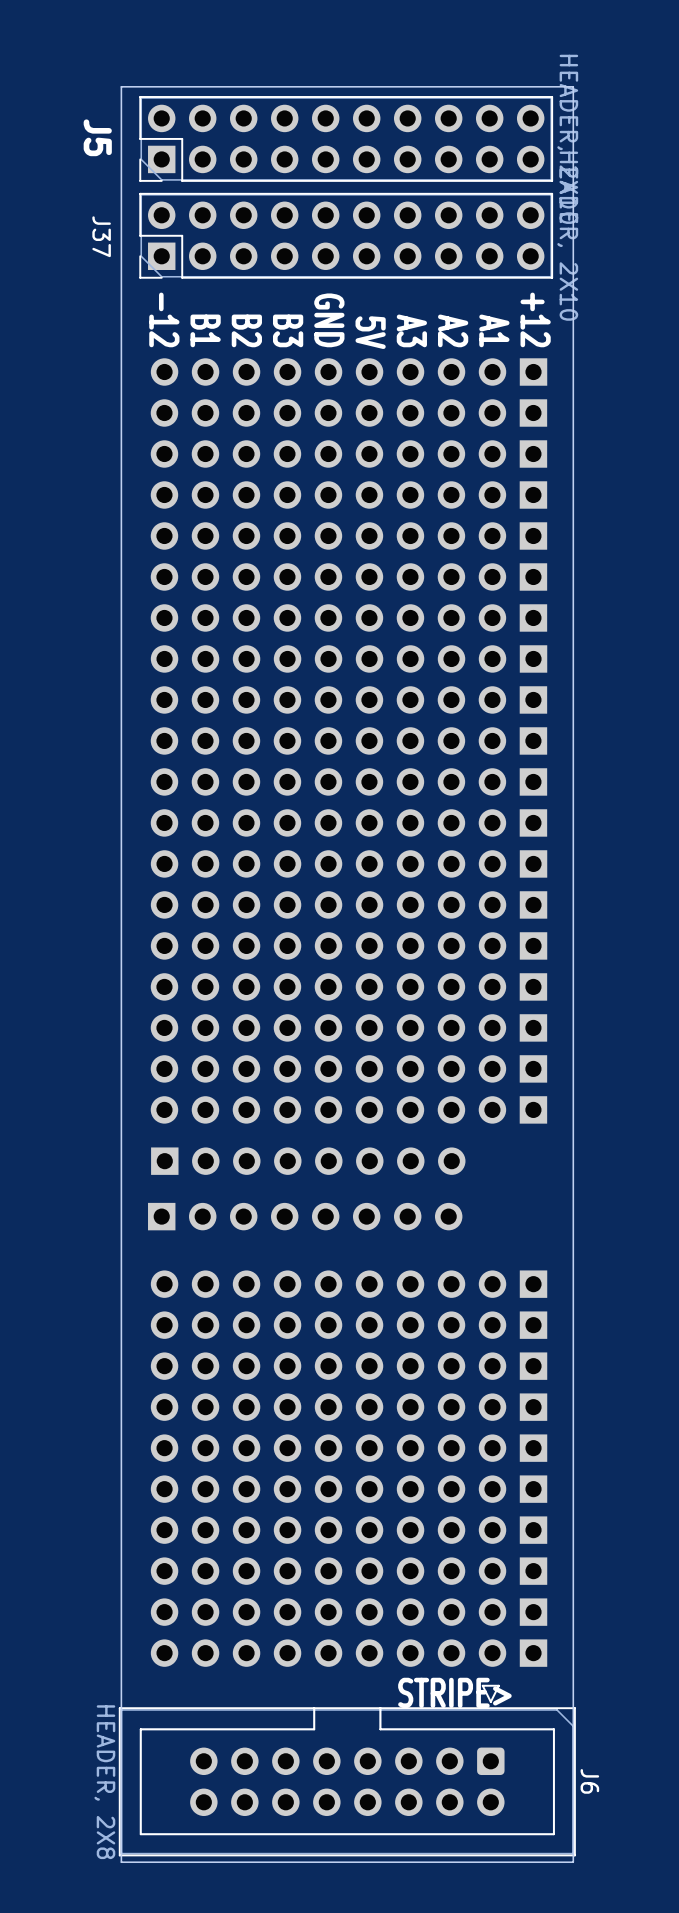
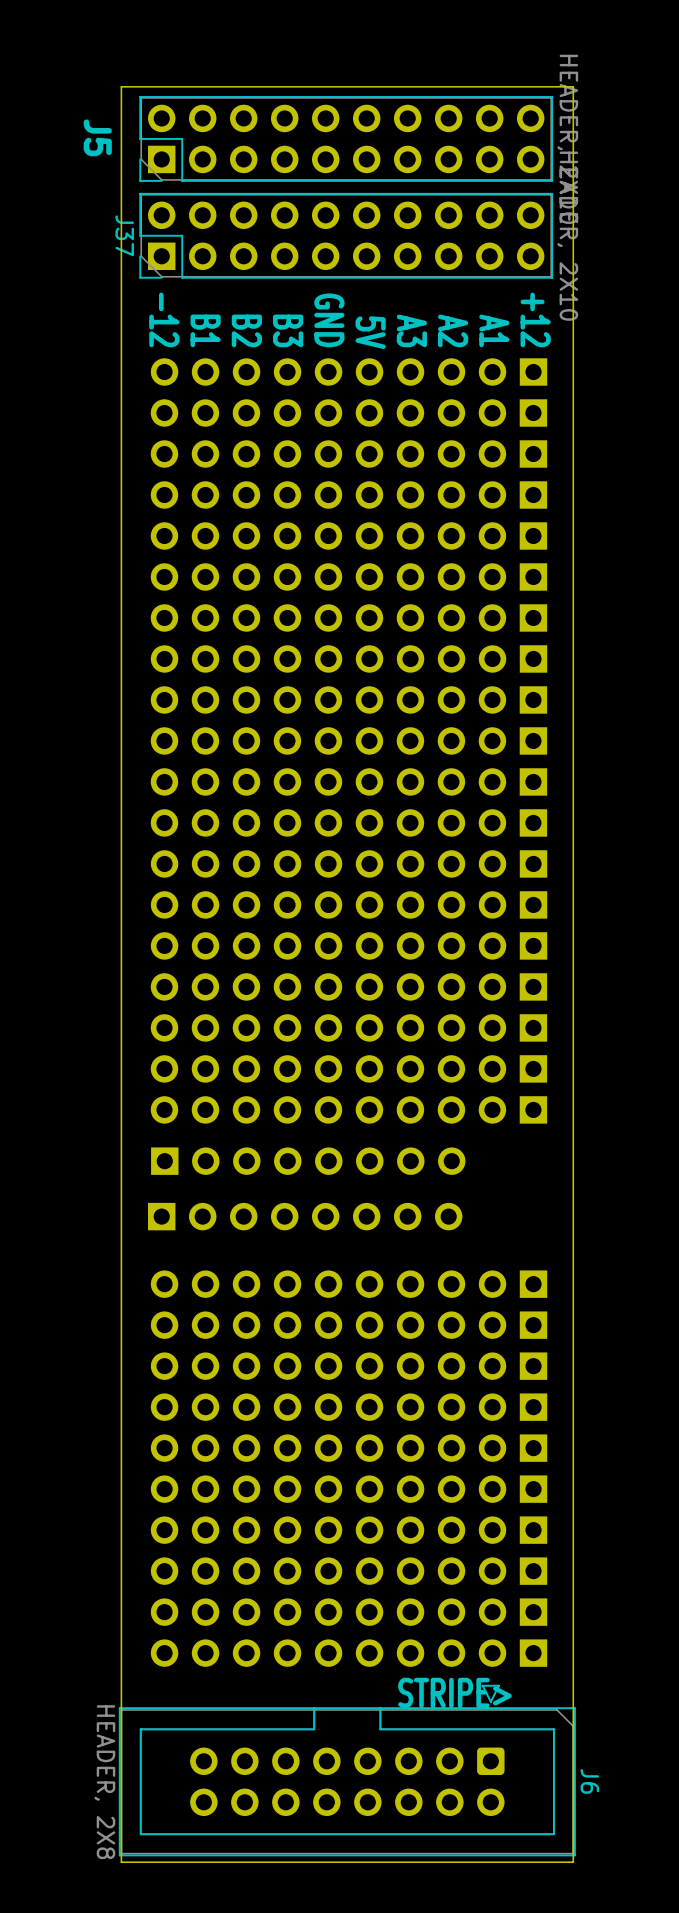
J37 name position: J37 (101, 236) -> J37 (124, 235)

